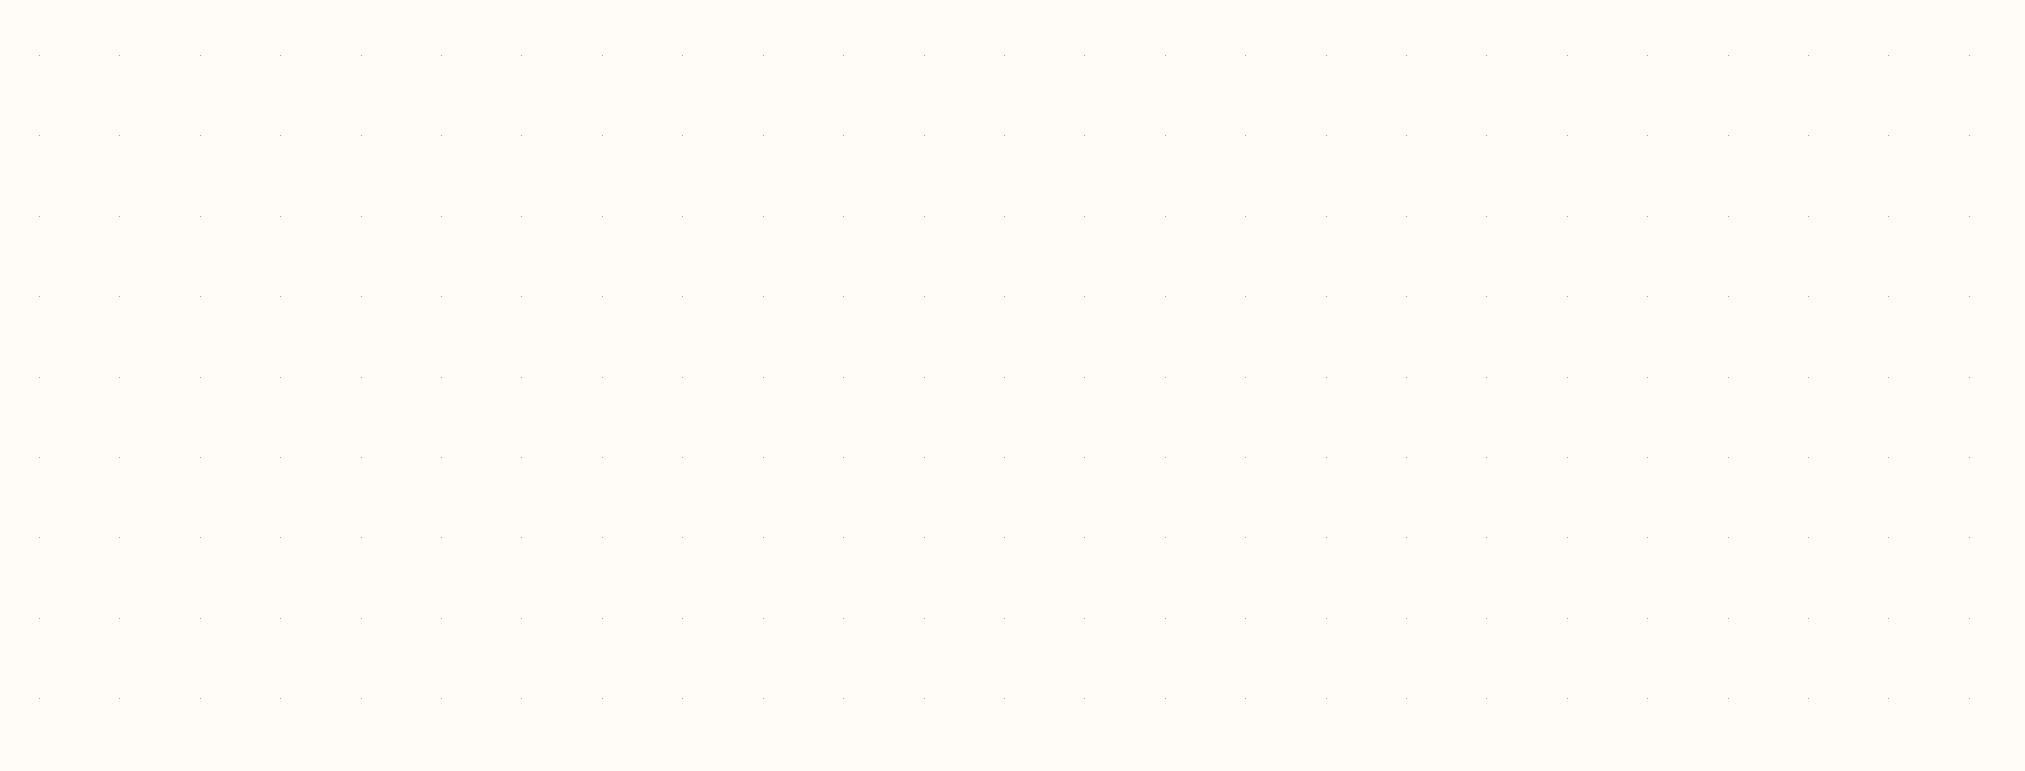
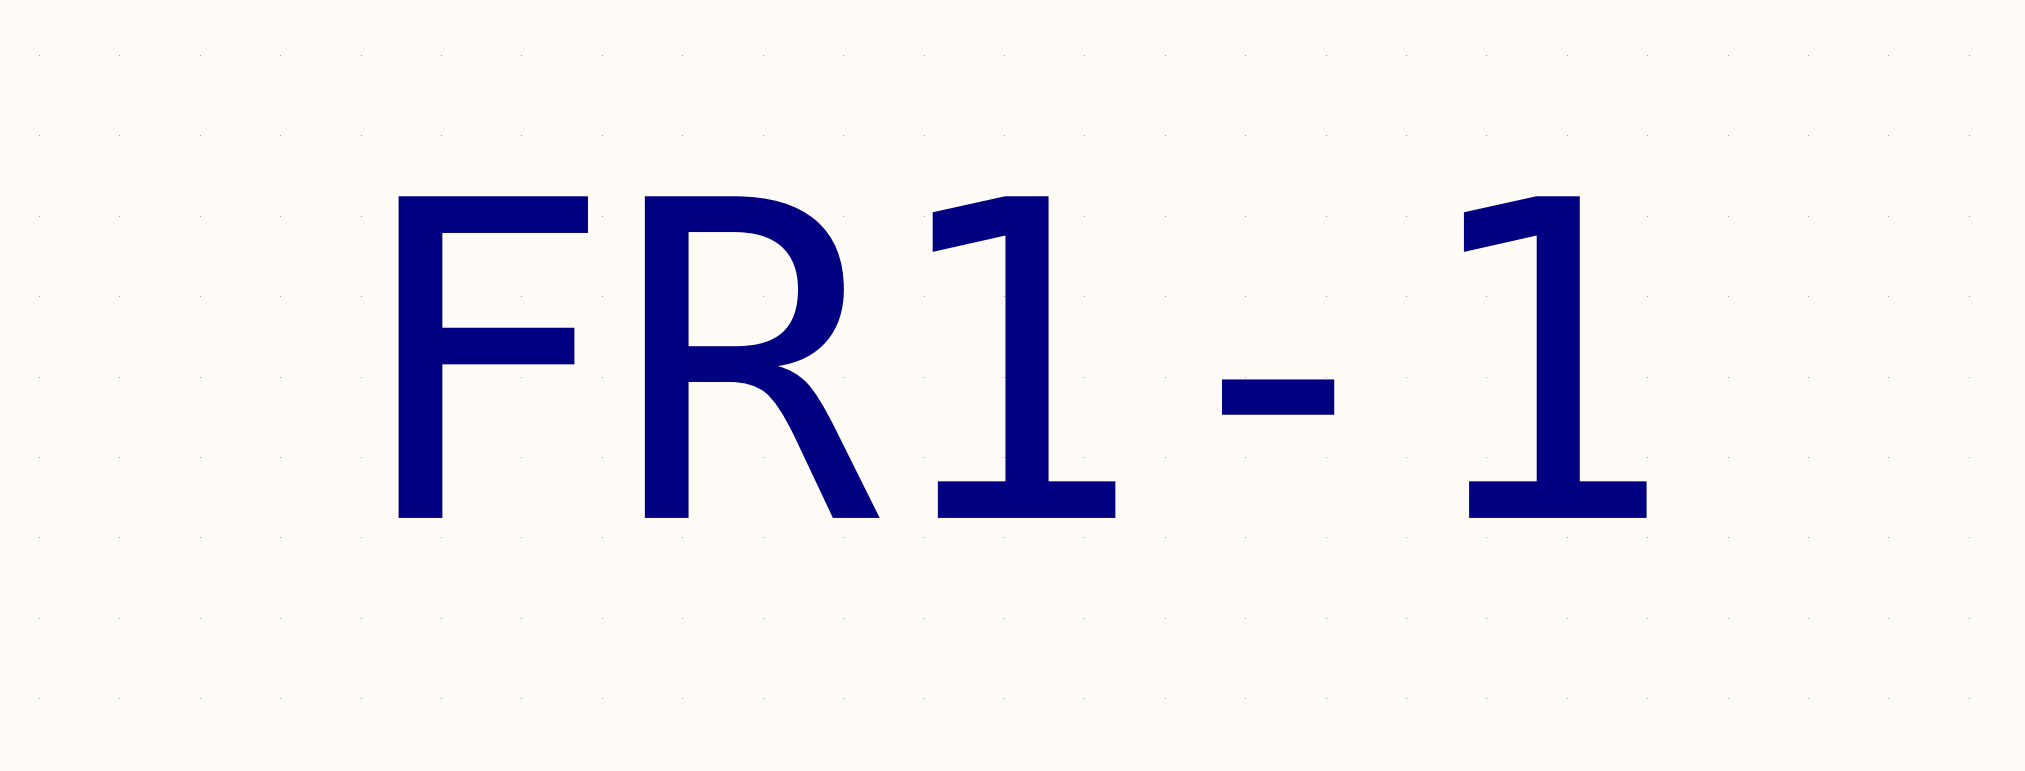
text: none -> FR1-1 (1022, 357)

